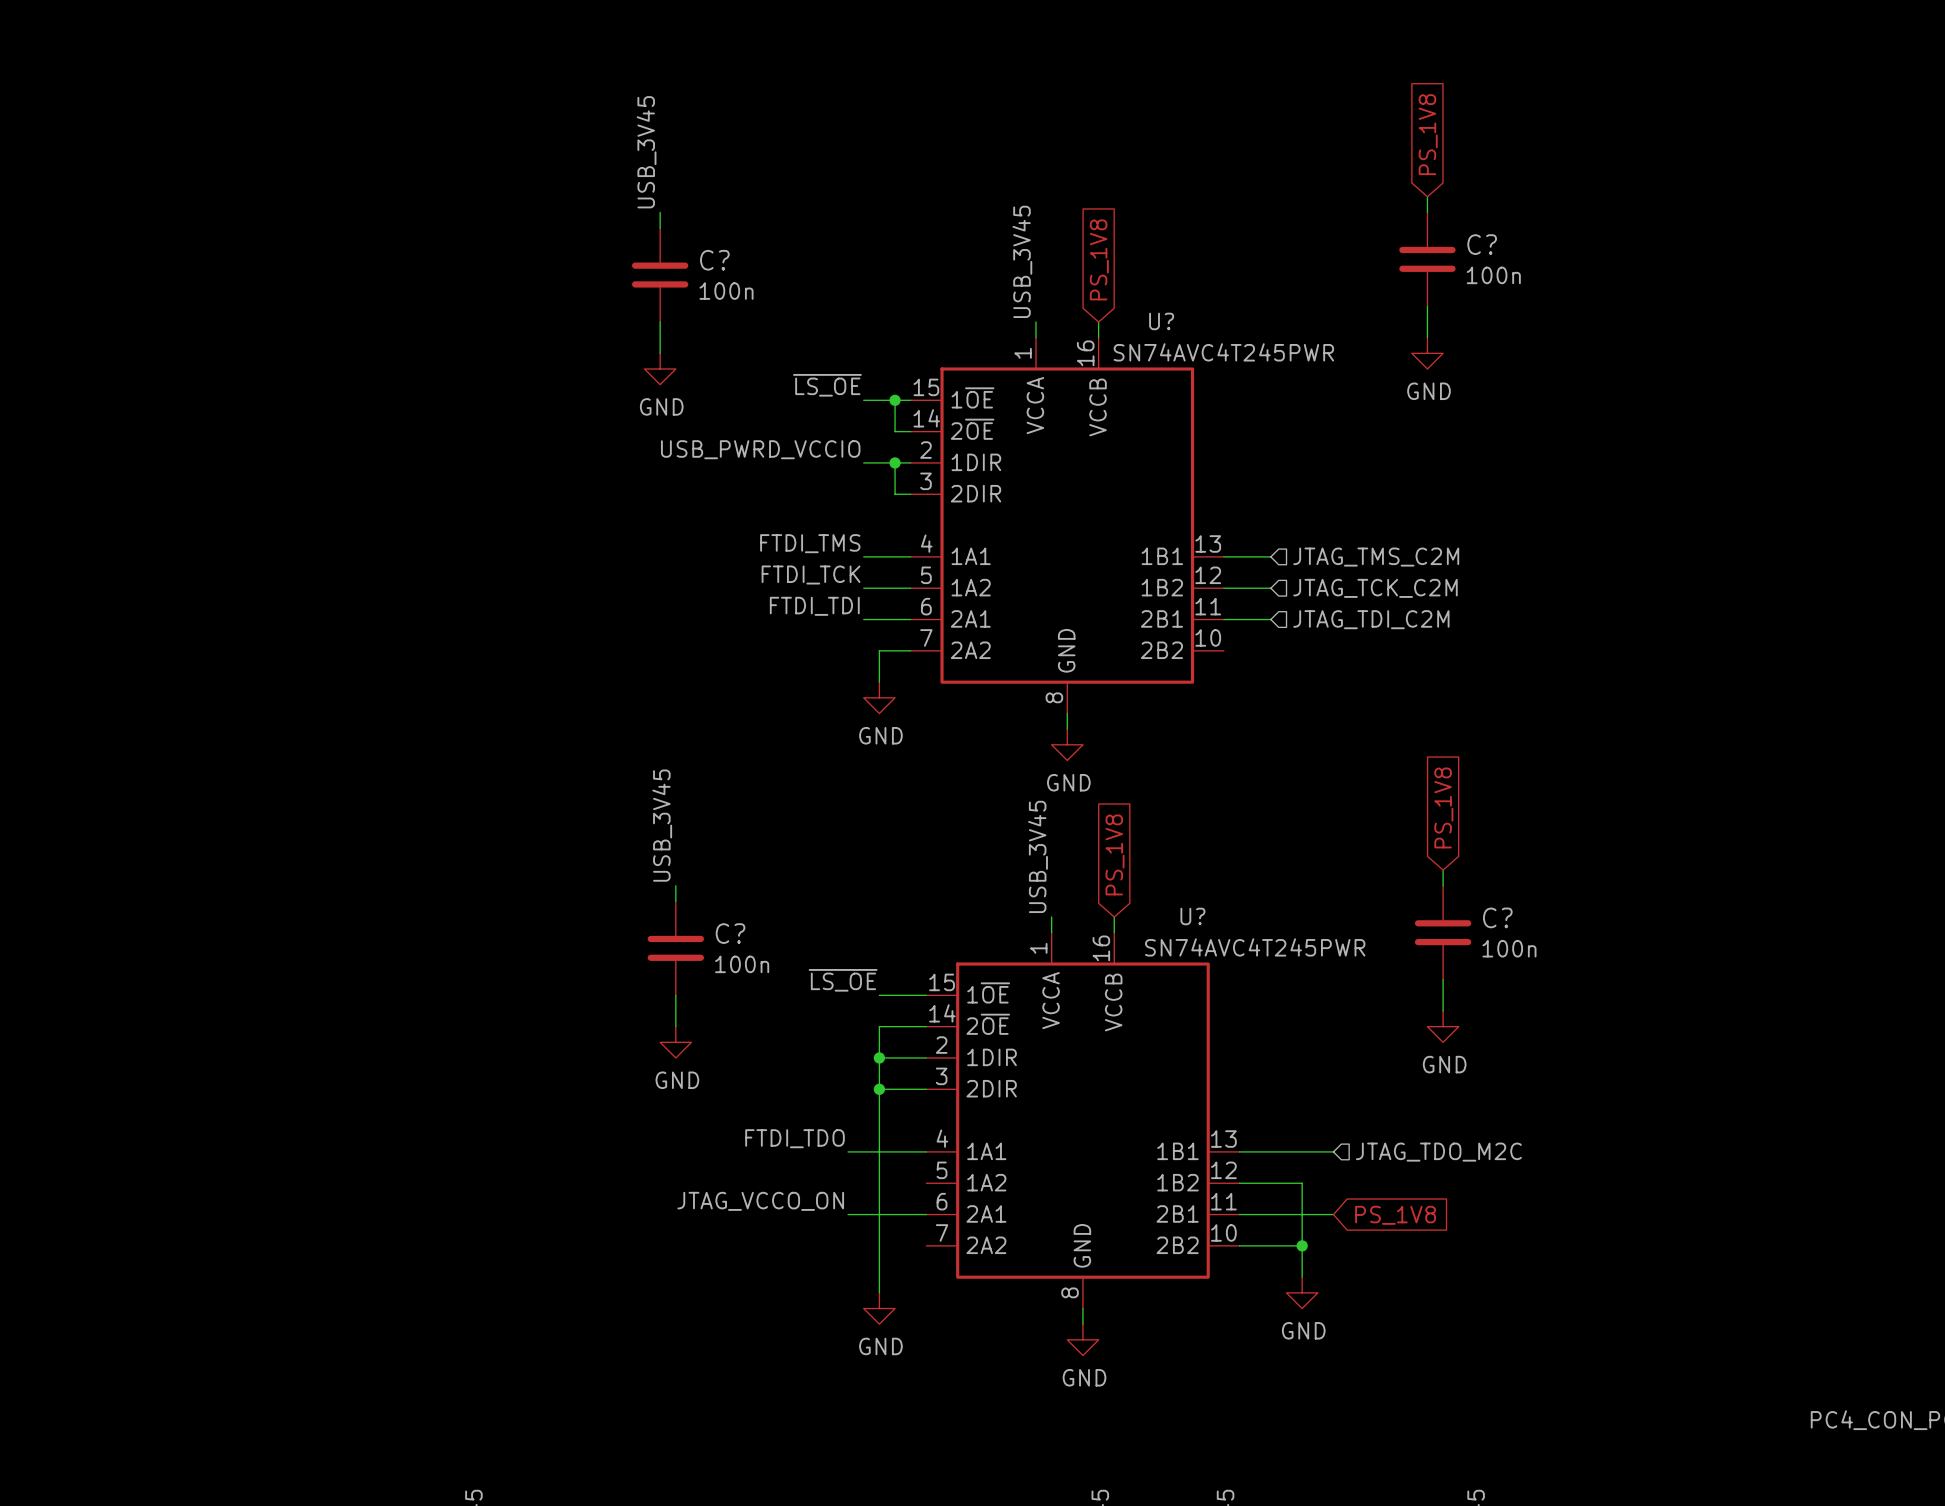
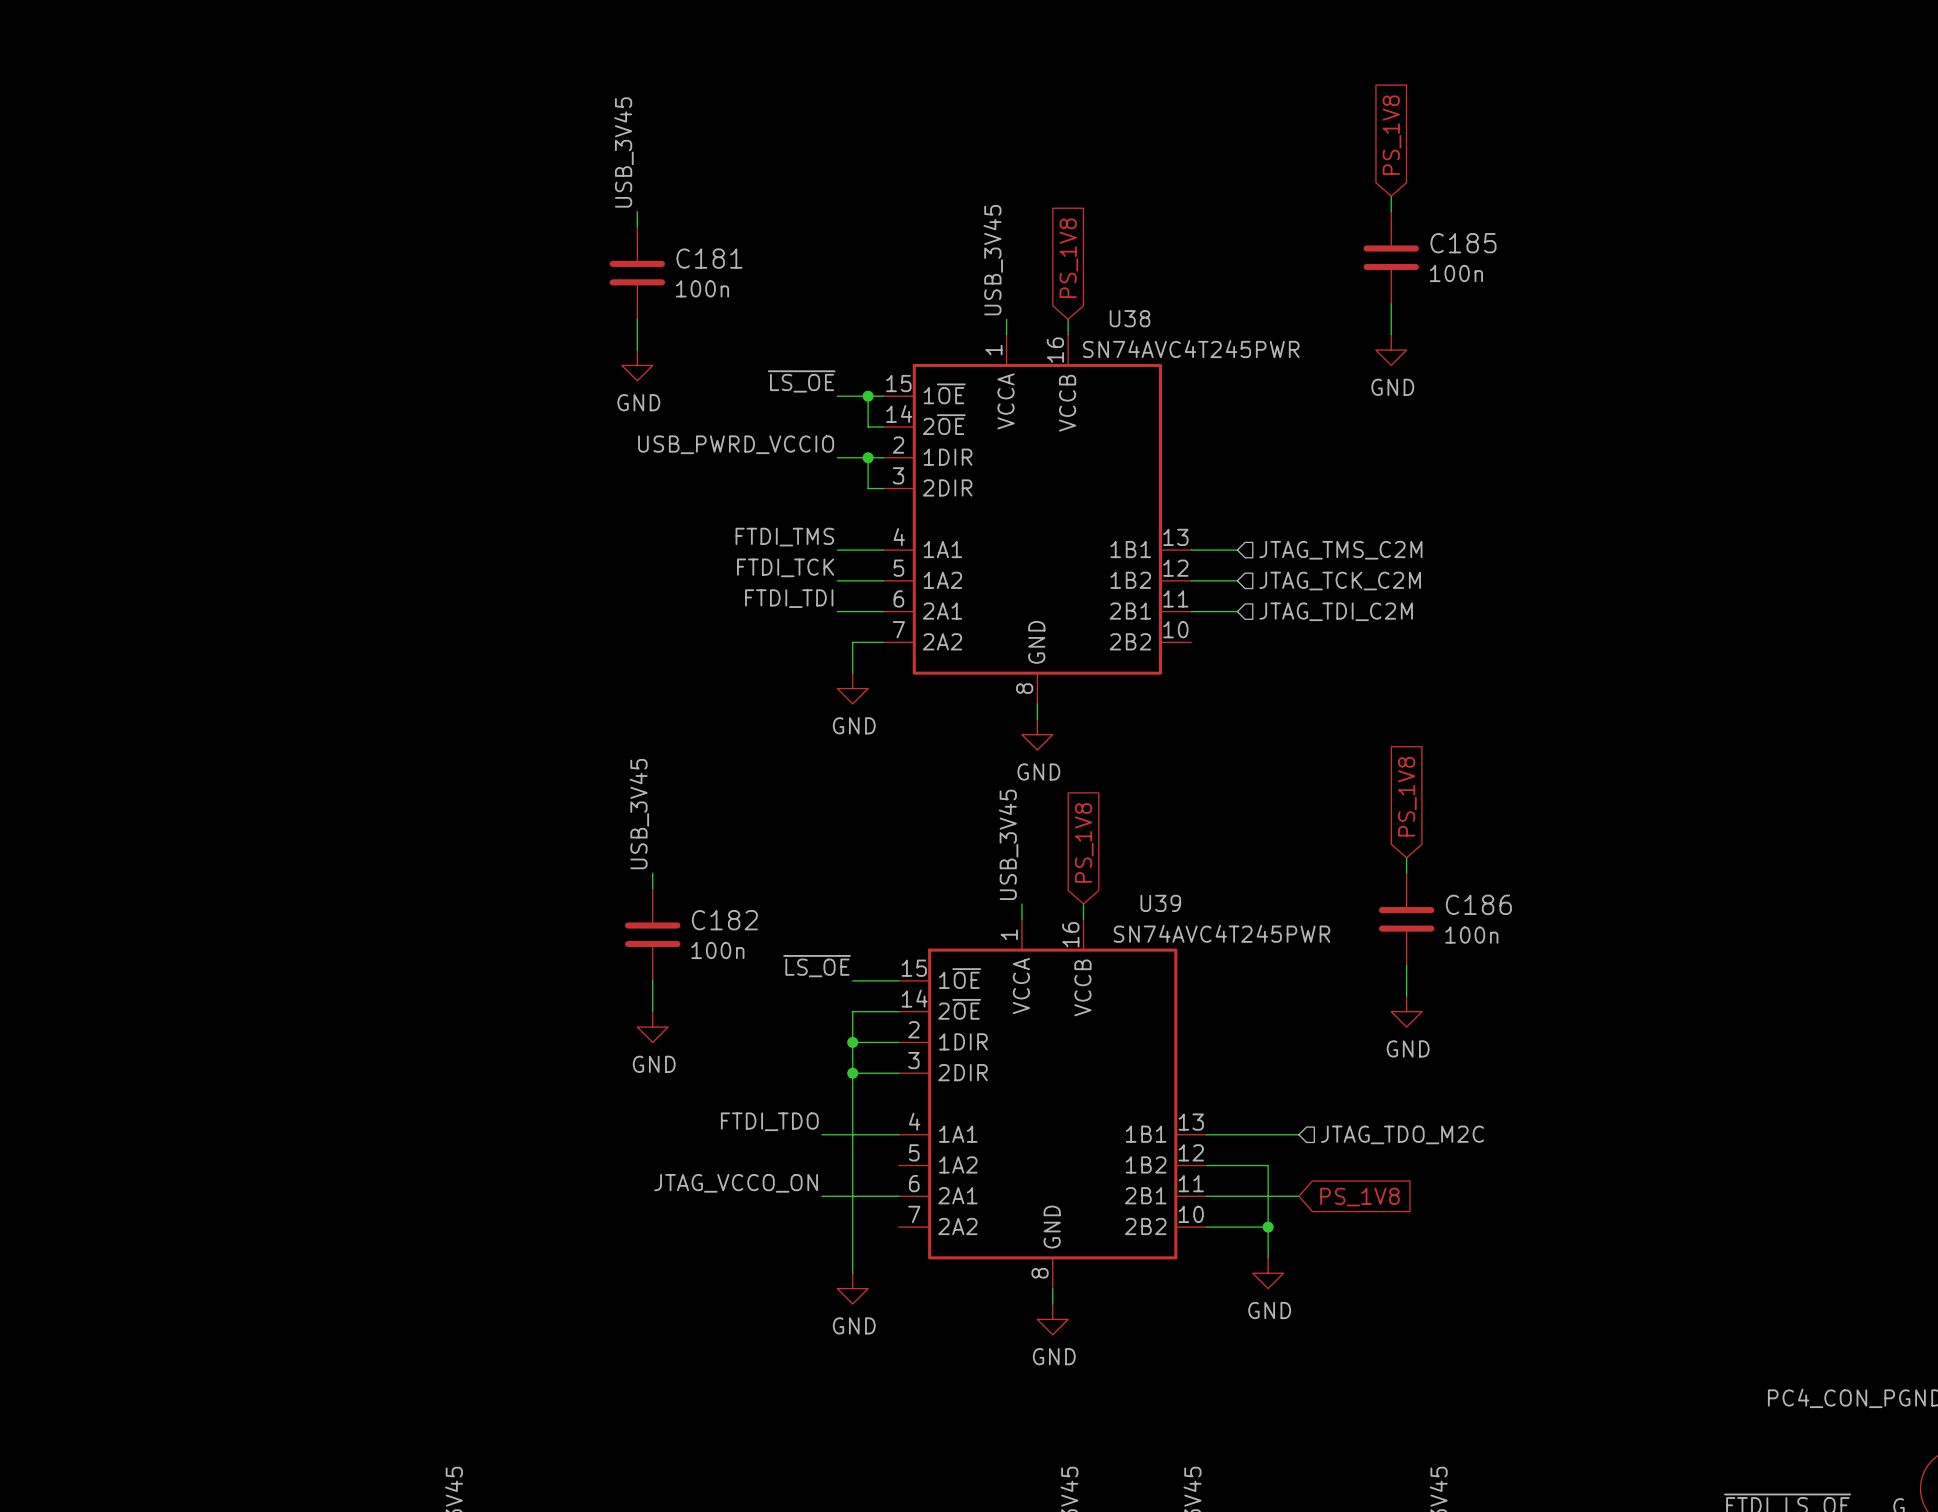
C? name: C? (1482, 244) -> C185 (1463, 243)
C? name: C? (714, 260) -> C181 (709, 258)
U? name: U? (1161, 321) -> U38 (1130, 318)
U? name: U? (1192, 916) -> U39 (1160, 903)
C? name: C? (1497, 917) -> C186 (1478, 904)
C? name: C? (730, 933) -> C182 (724, 920)

